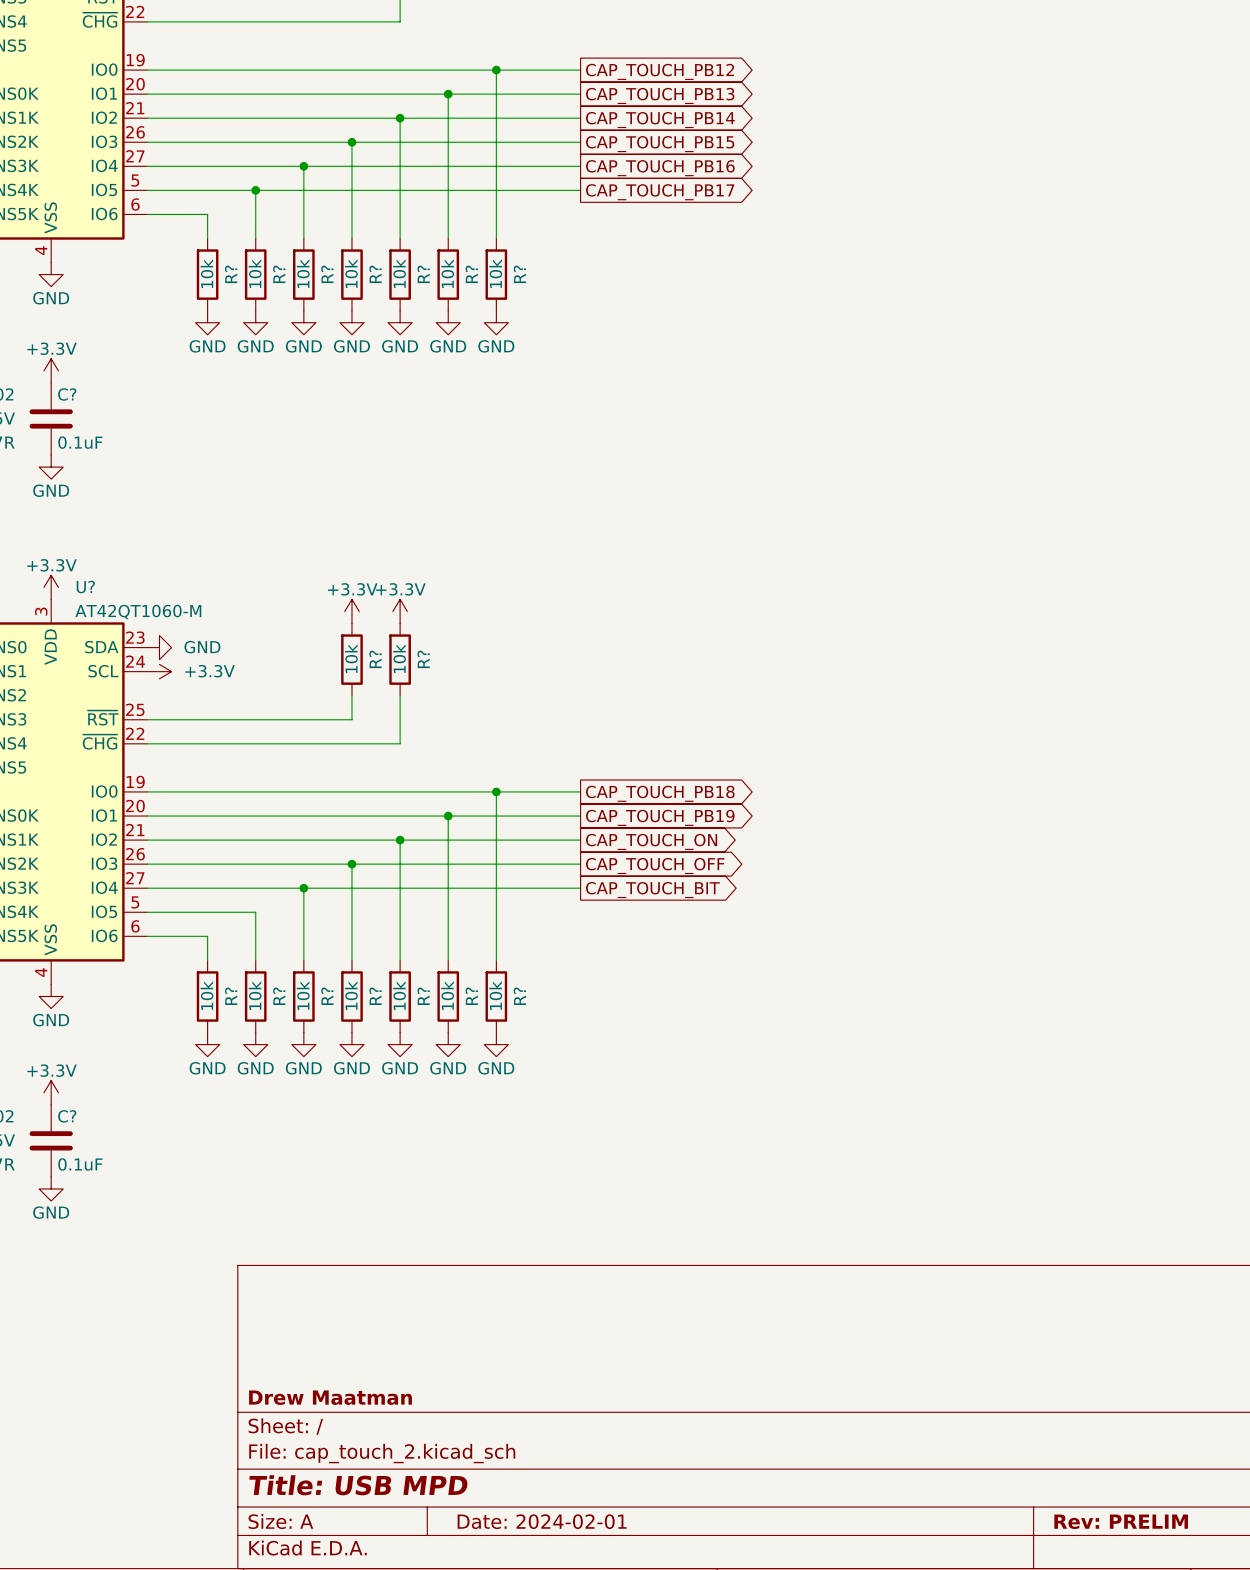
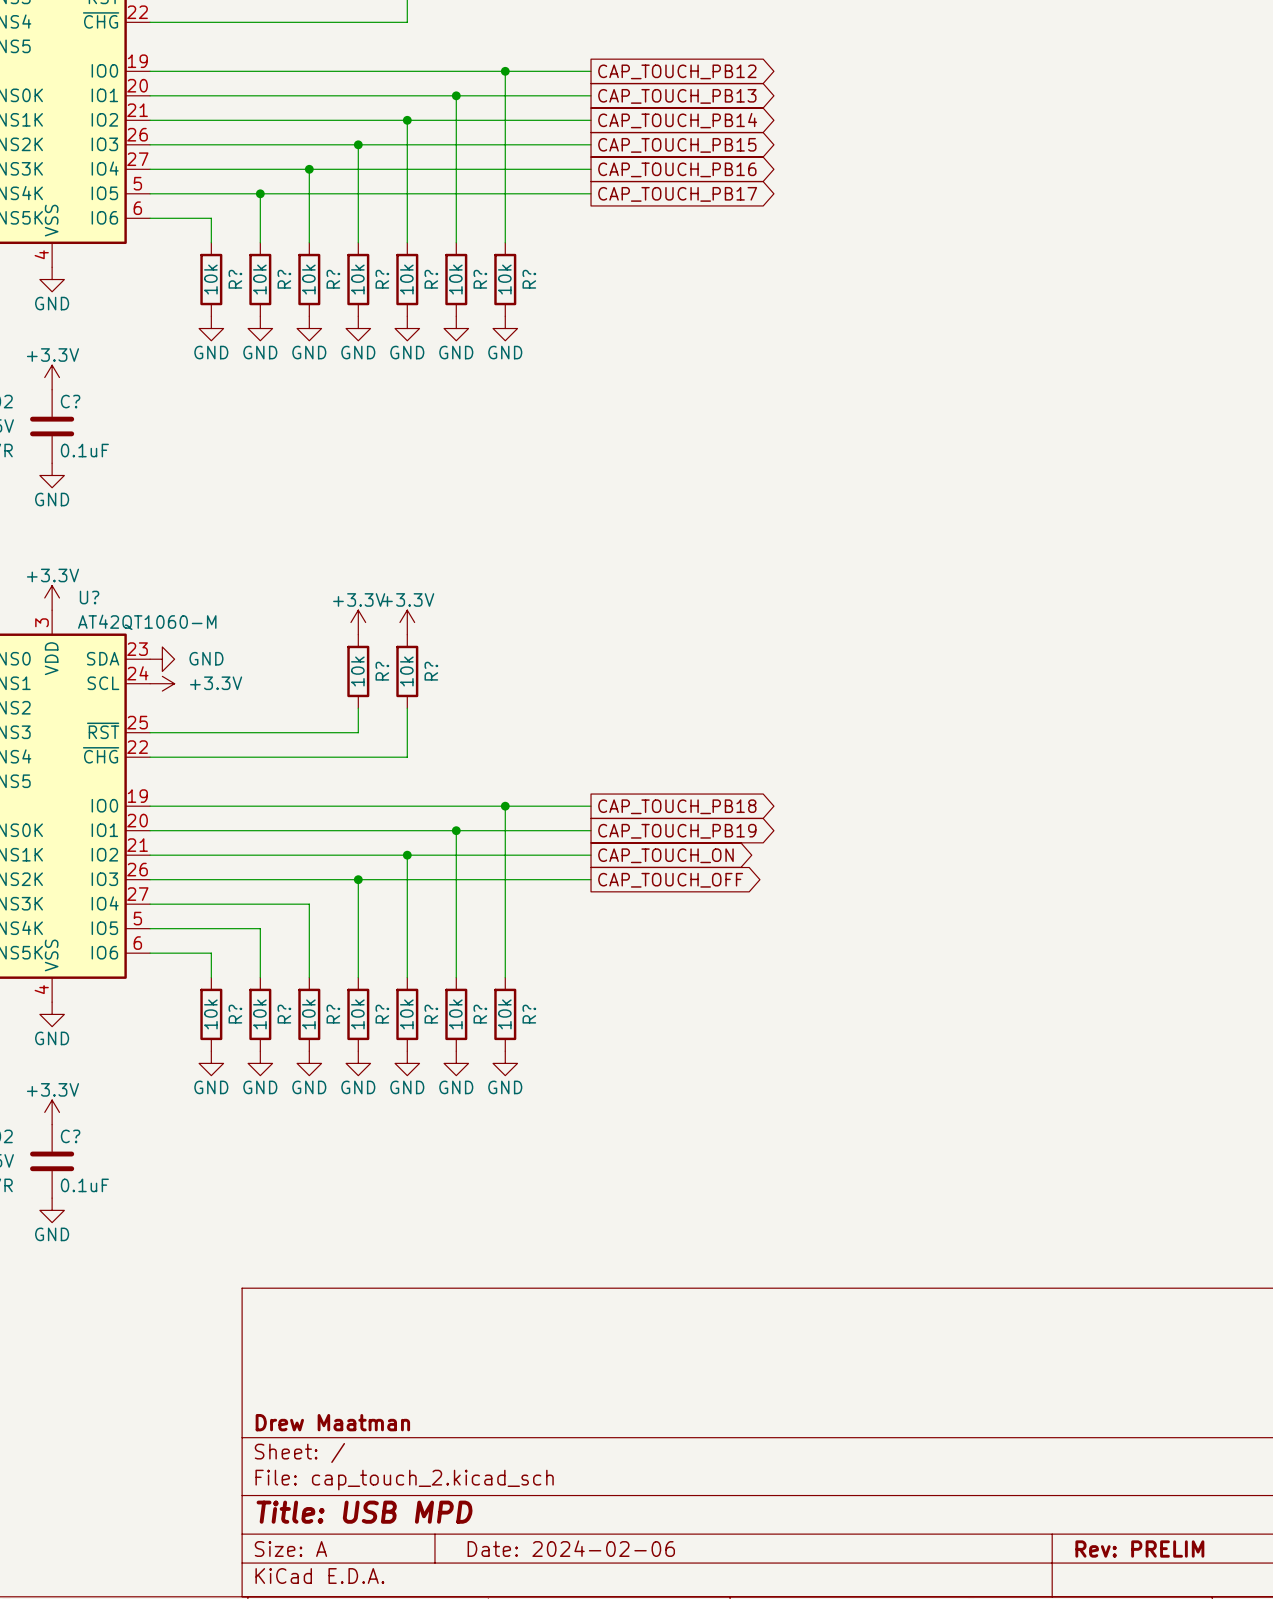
wire: (303, 888) (580, 888) -> none
junction: (303, 888) -> none
global label: CAP_TOUCH_BIT (652, 890) -> none
title block: Date: 2024-02-01 (542, 1521) -> Date: 2024-02-06 (571, 1548)

